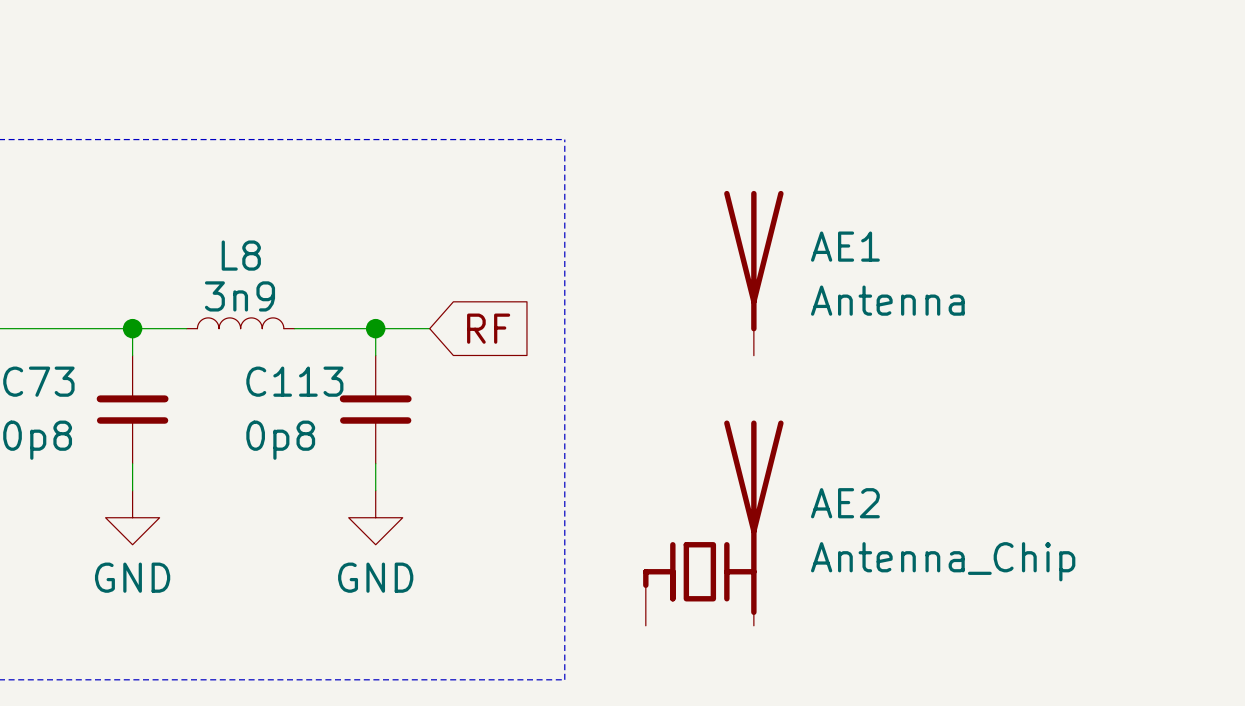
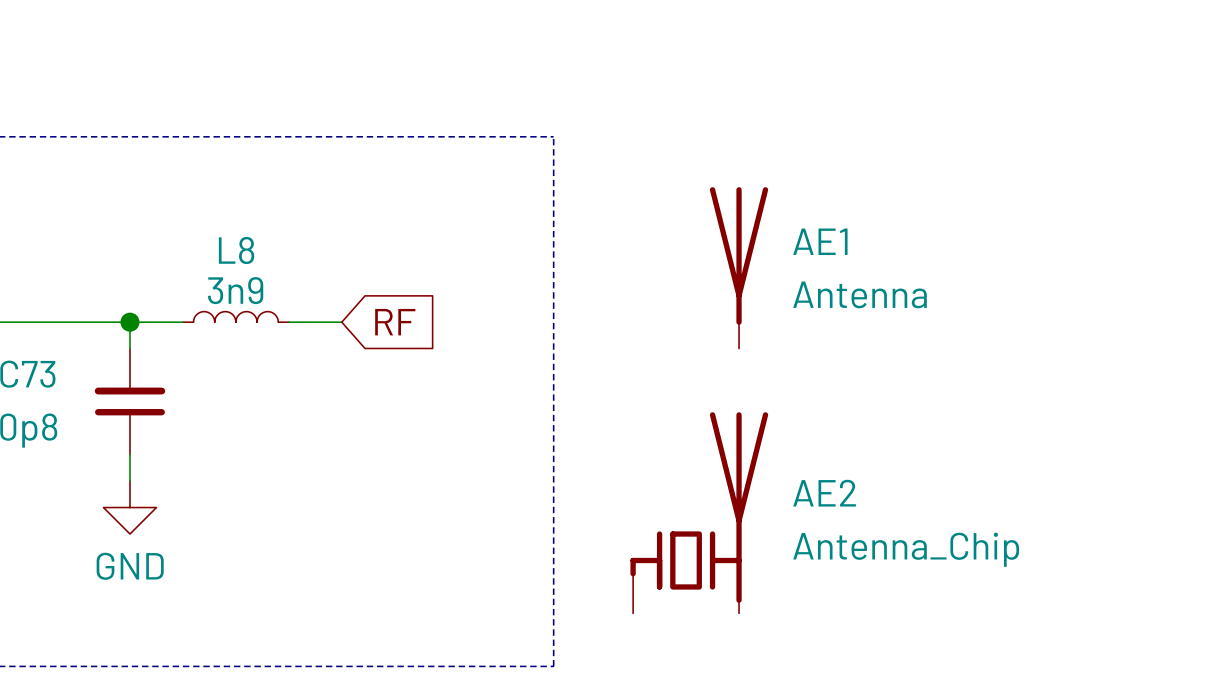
wire: (348, 328) (429, 328) -> none
wire: (375, 328) (375, 355) -> none
junction: (375, 328) -> none
global label position: RF (488, 328) -> RF (395, 322)
C113: 0p8 (375, 409) -> none
wire: (375, 463) (375, 490) -> none
power symbol: GND (375, 517) -> none

